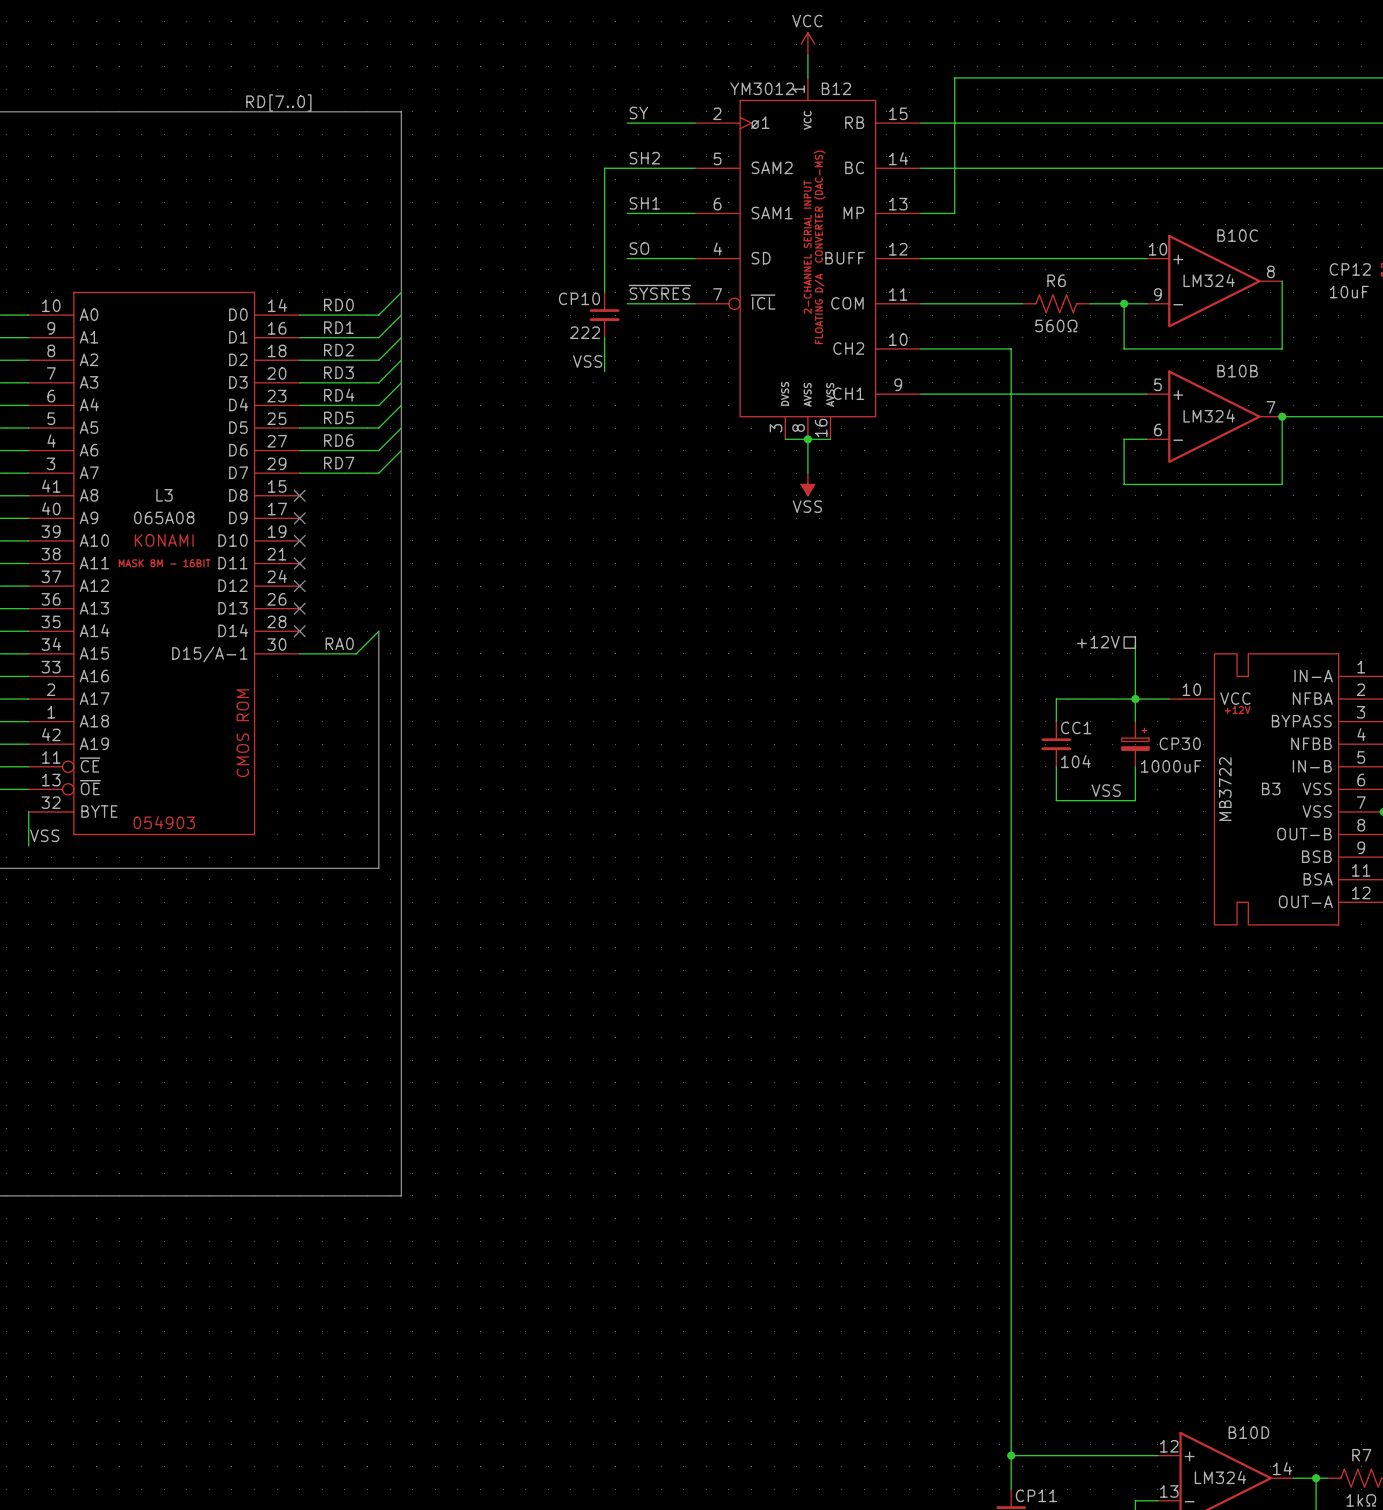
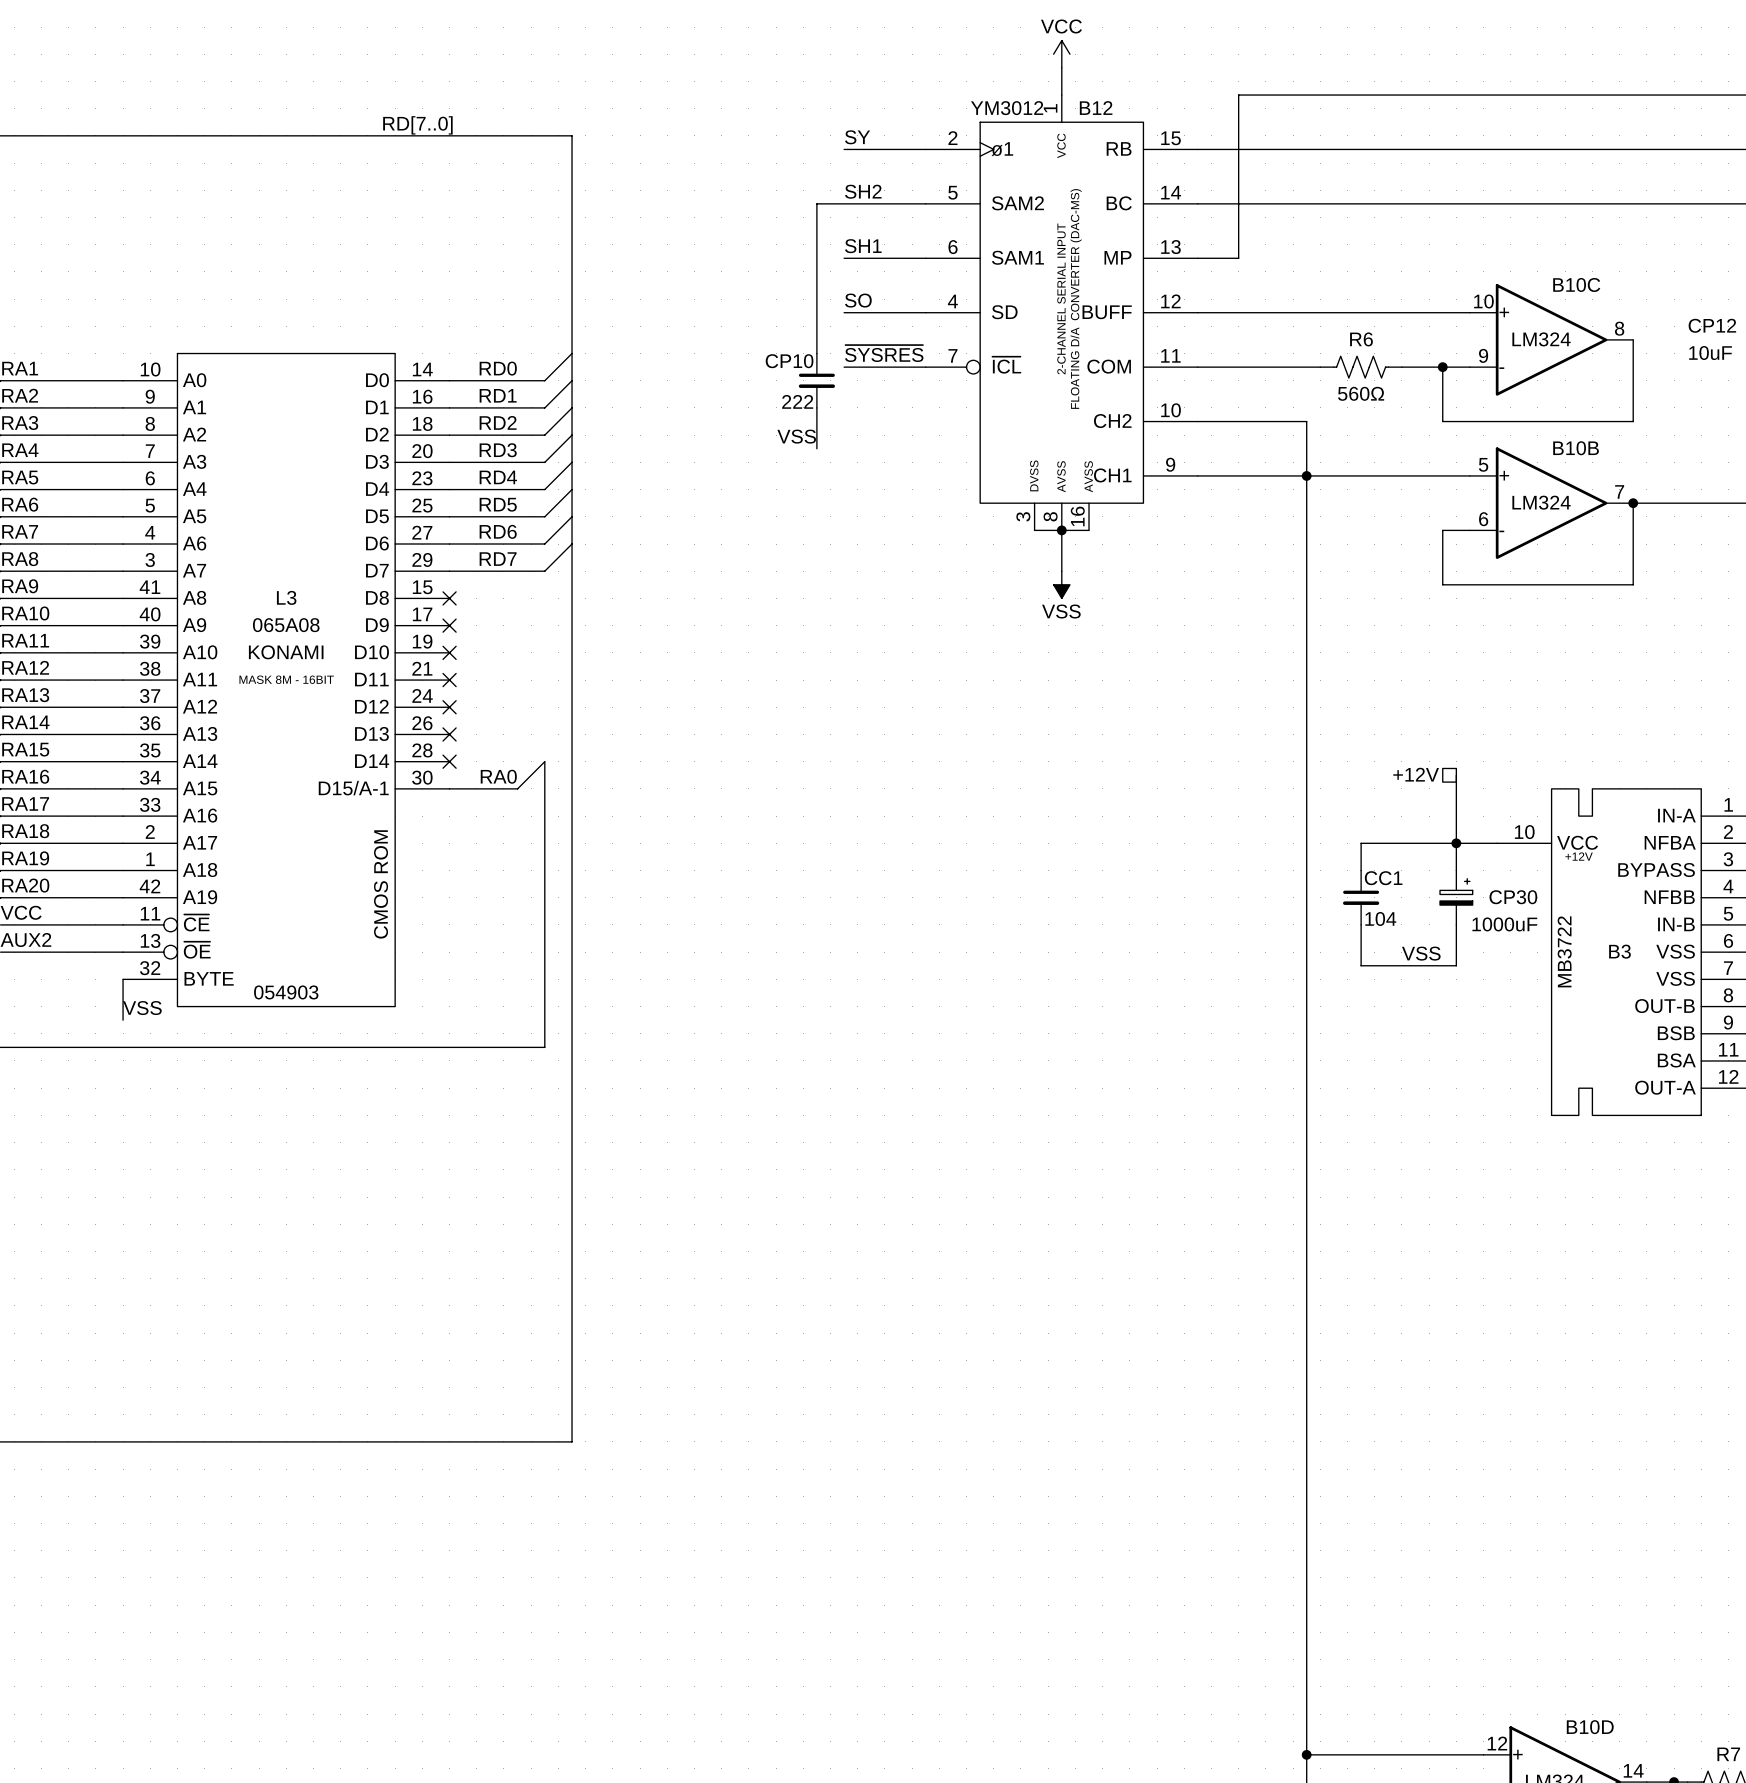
junction: none -> (1306, 475)

